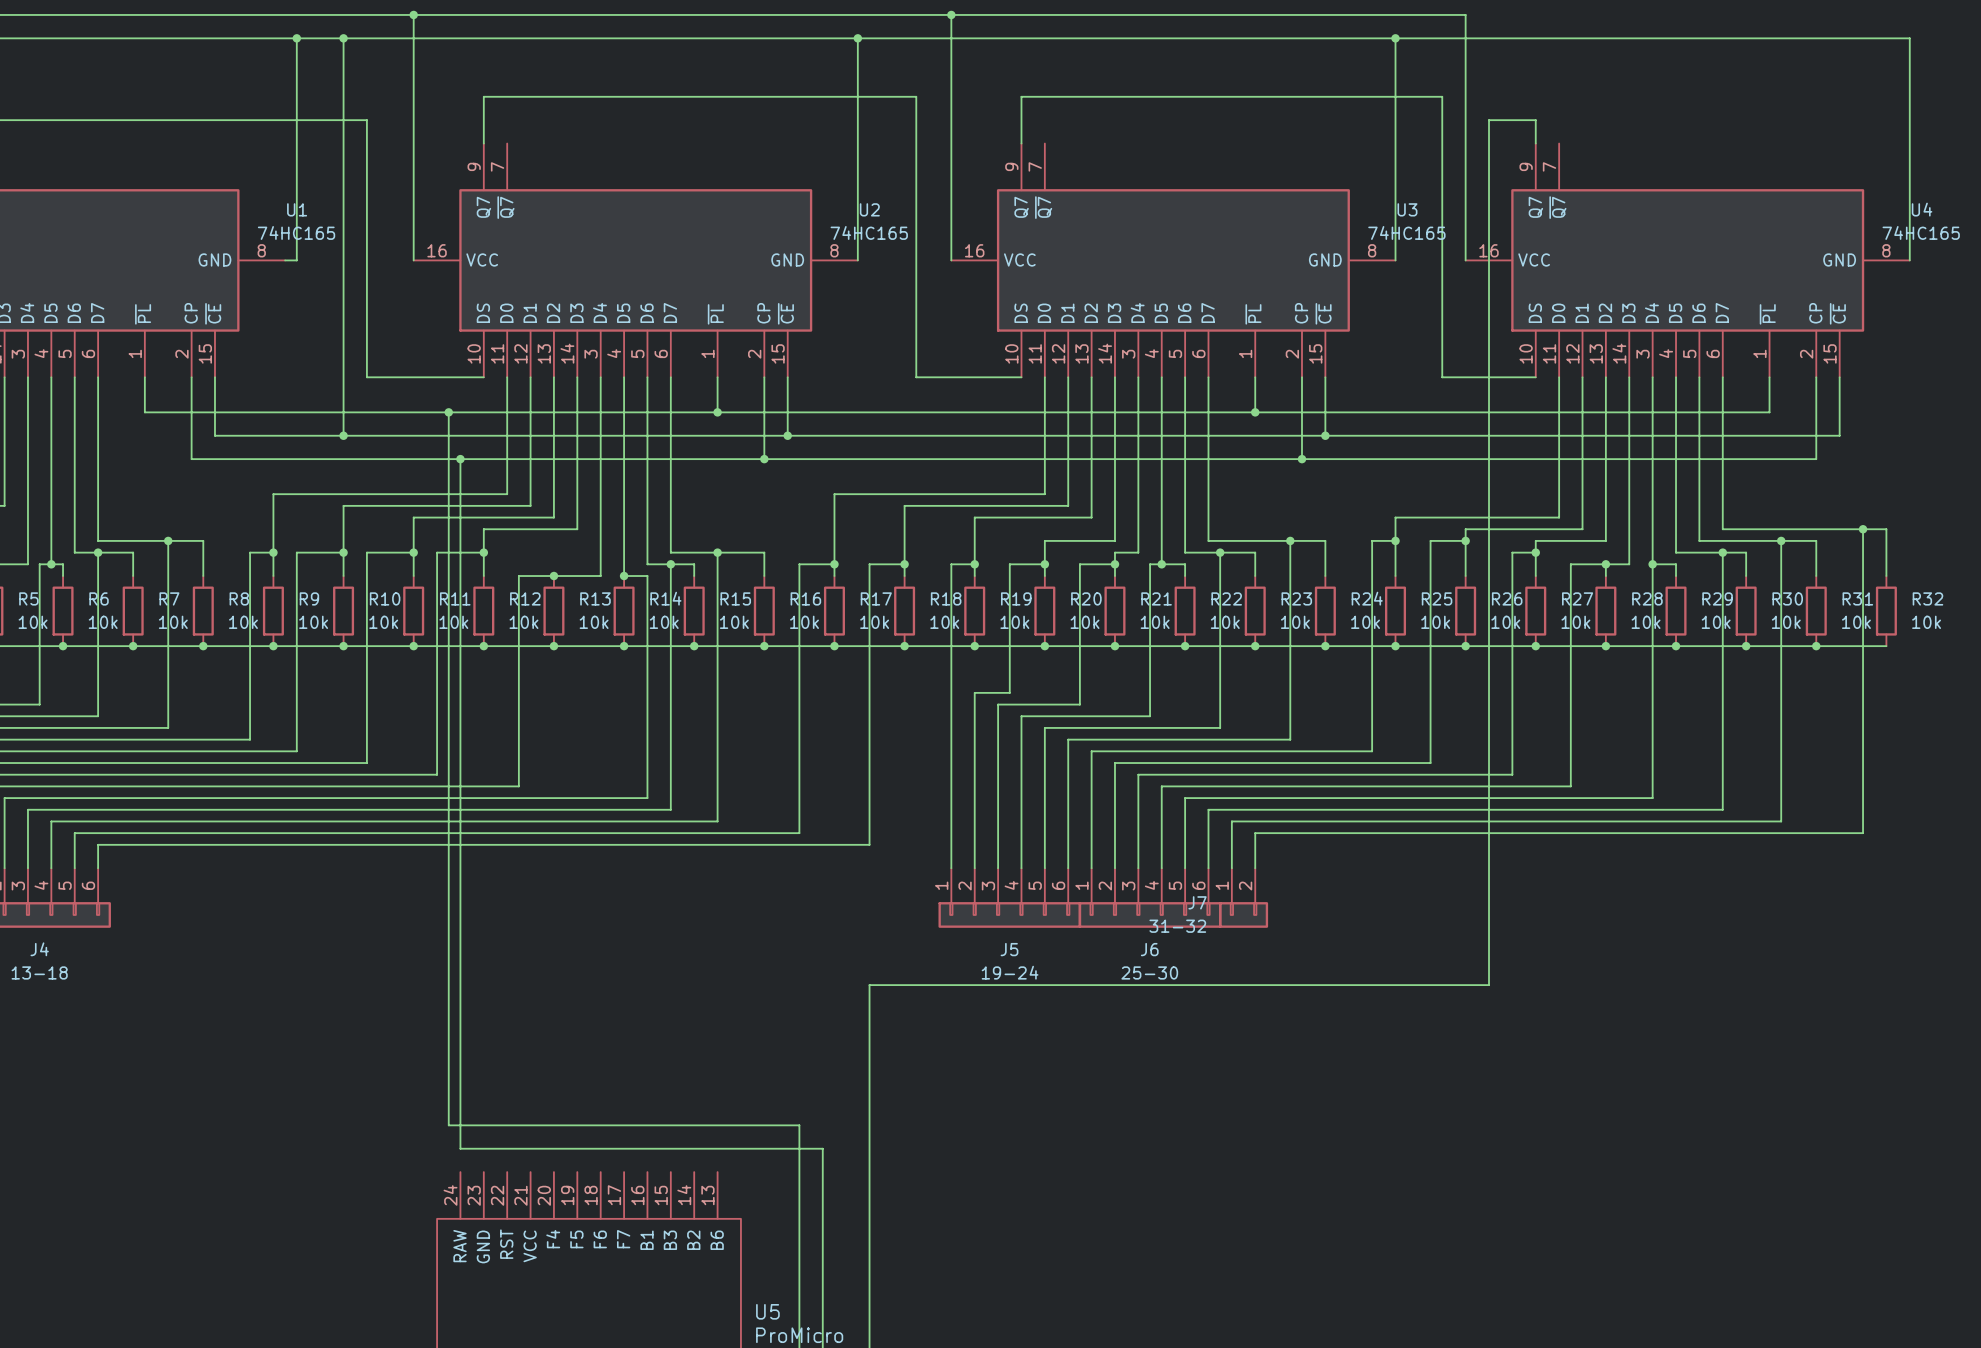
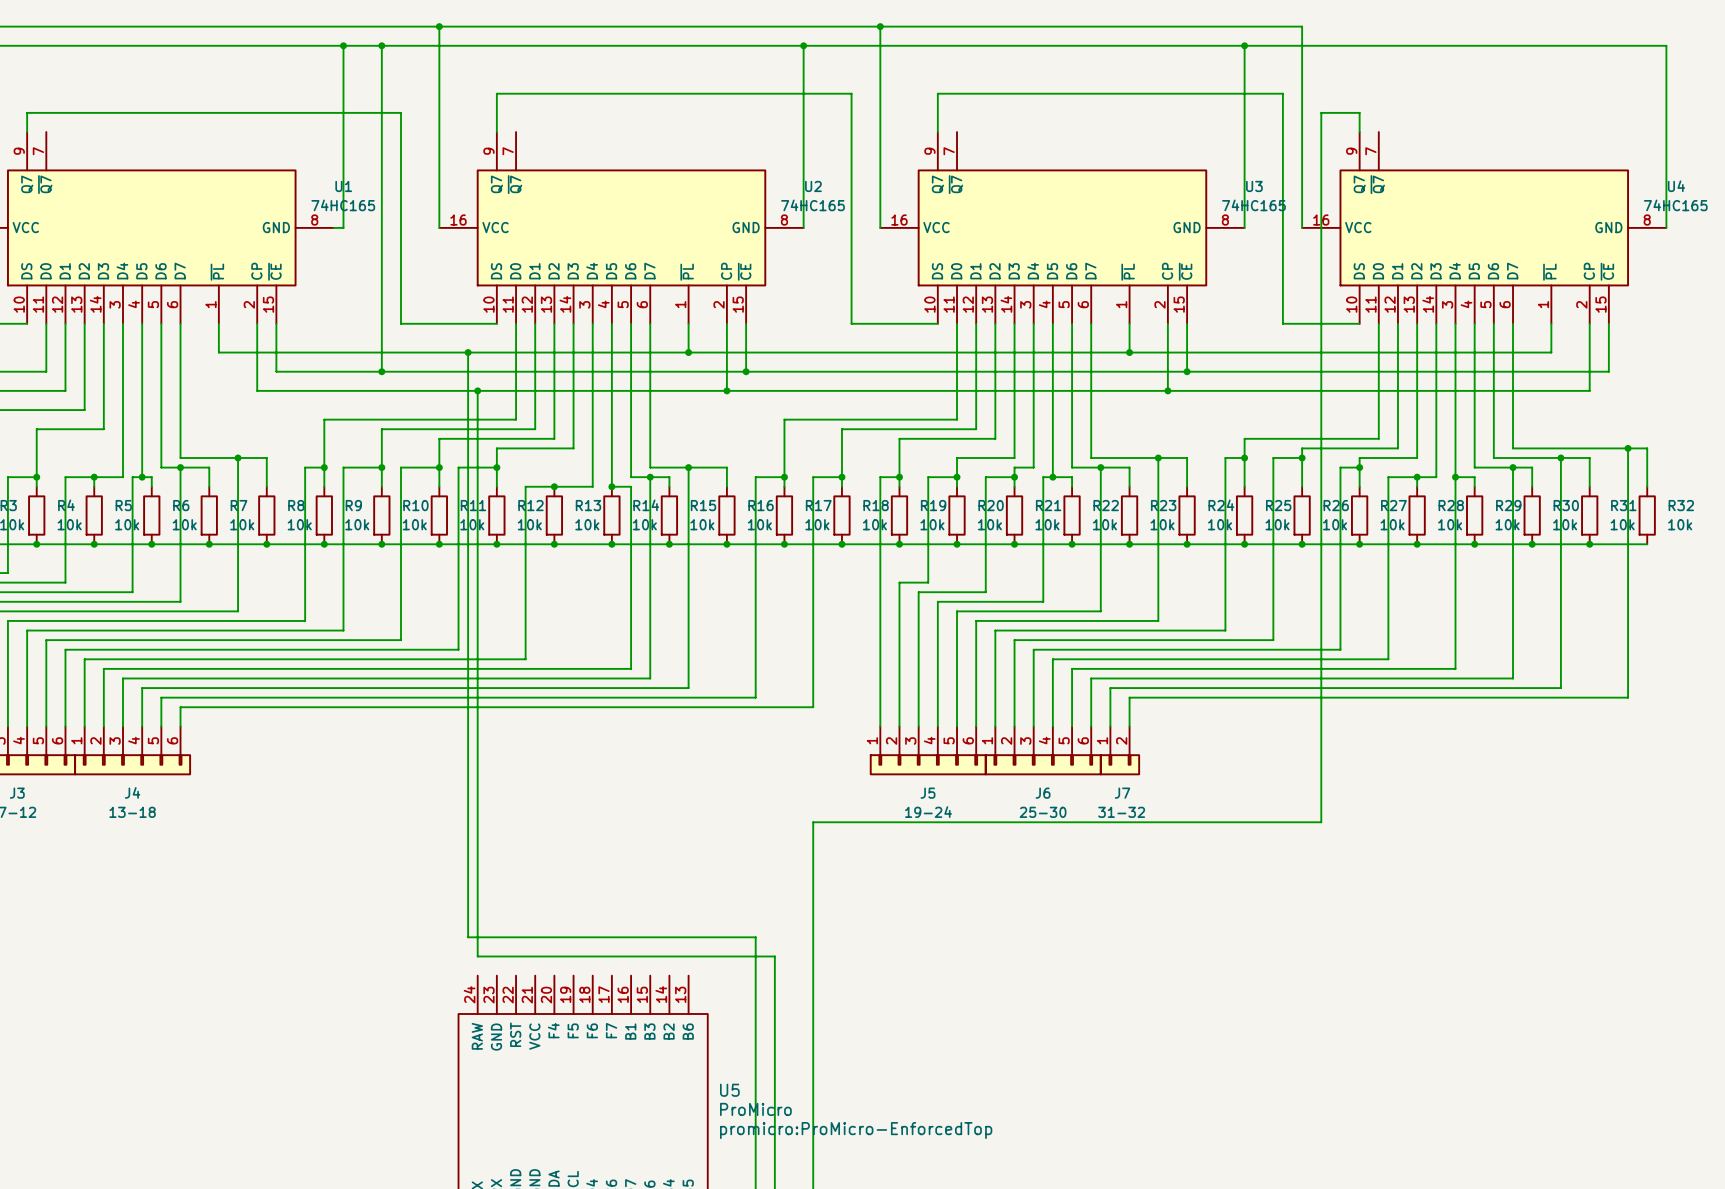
J7 name position: J7 (1197, 902) -> J7 (1122, 793)
J7 value position: 31-32 (1177, 926) -> 31-32 (1121, 812)

